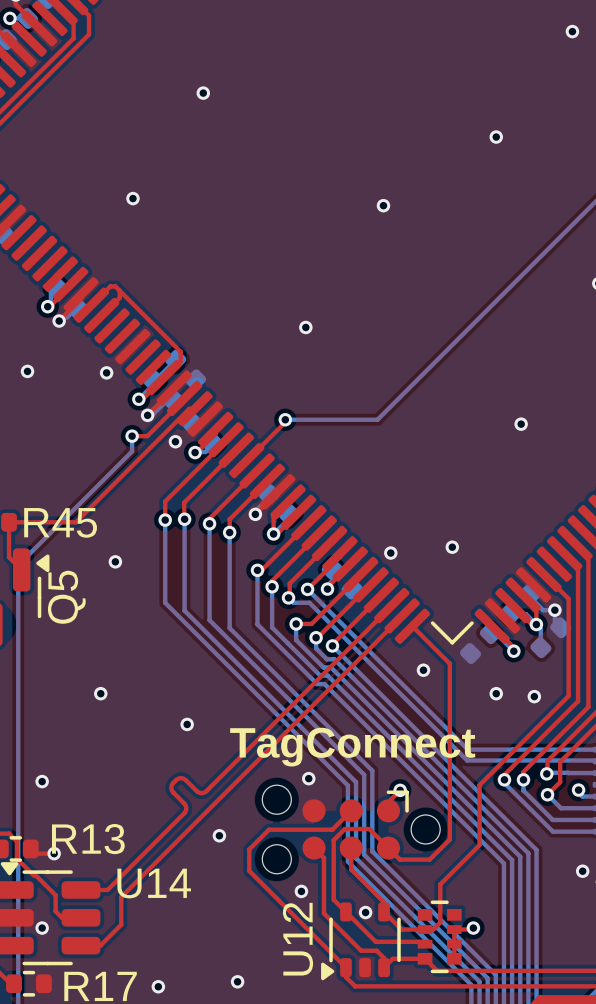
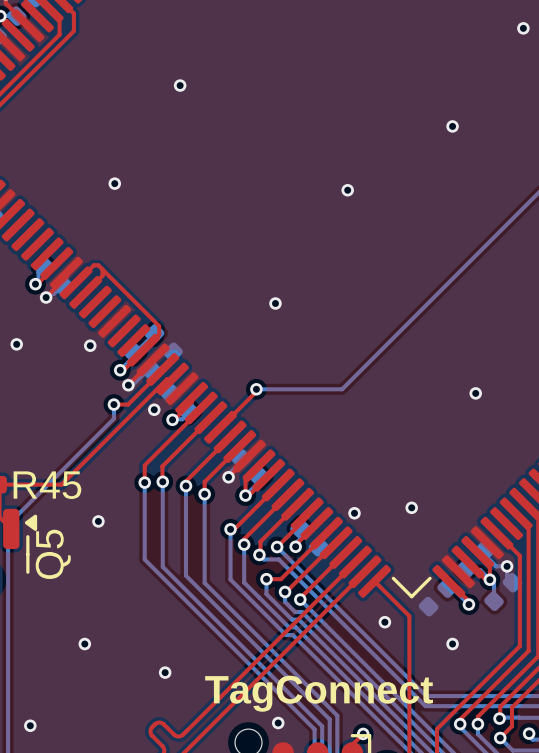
via: (534, 696) -> none

